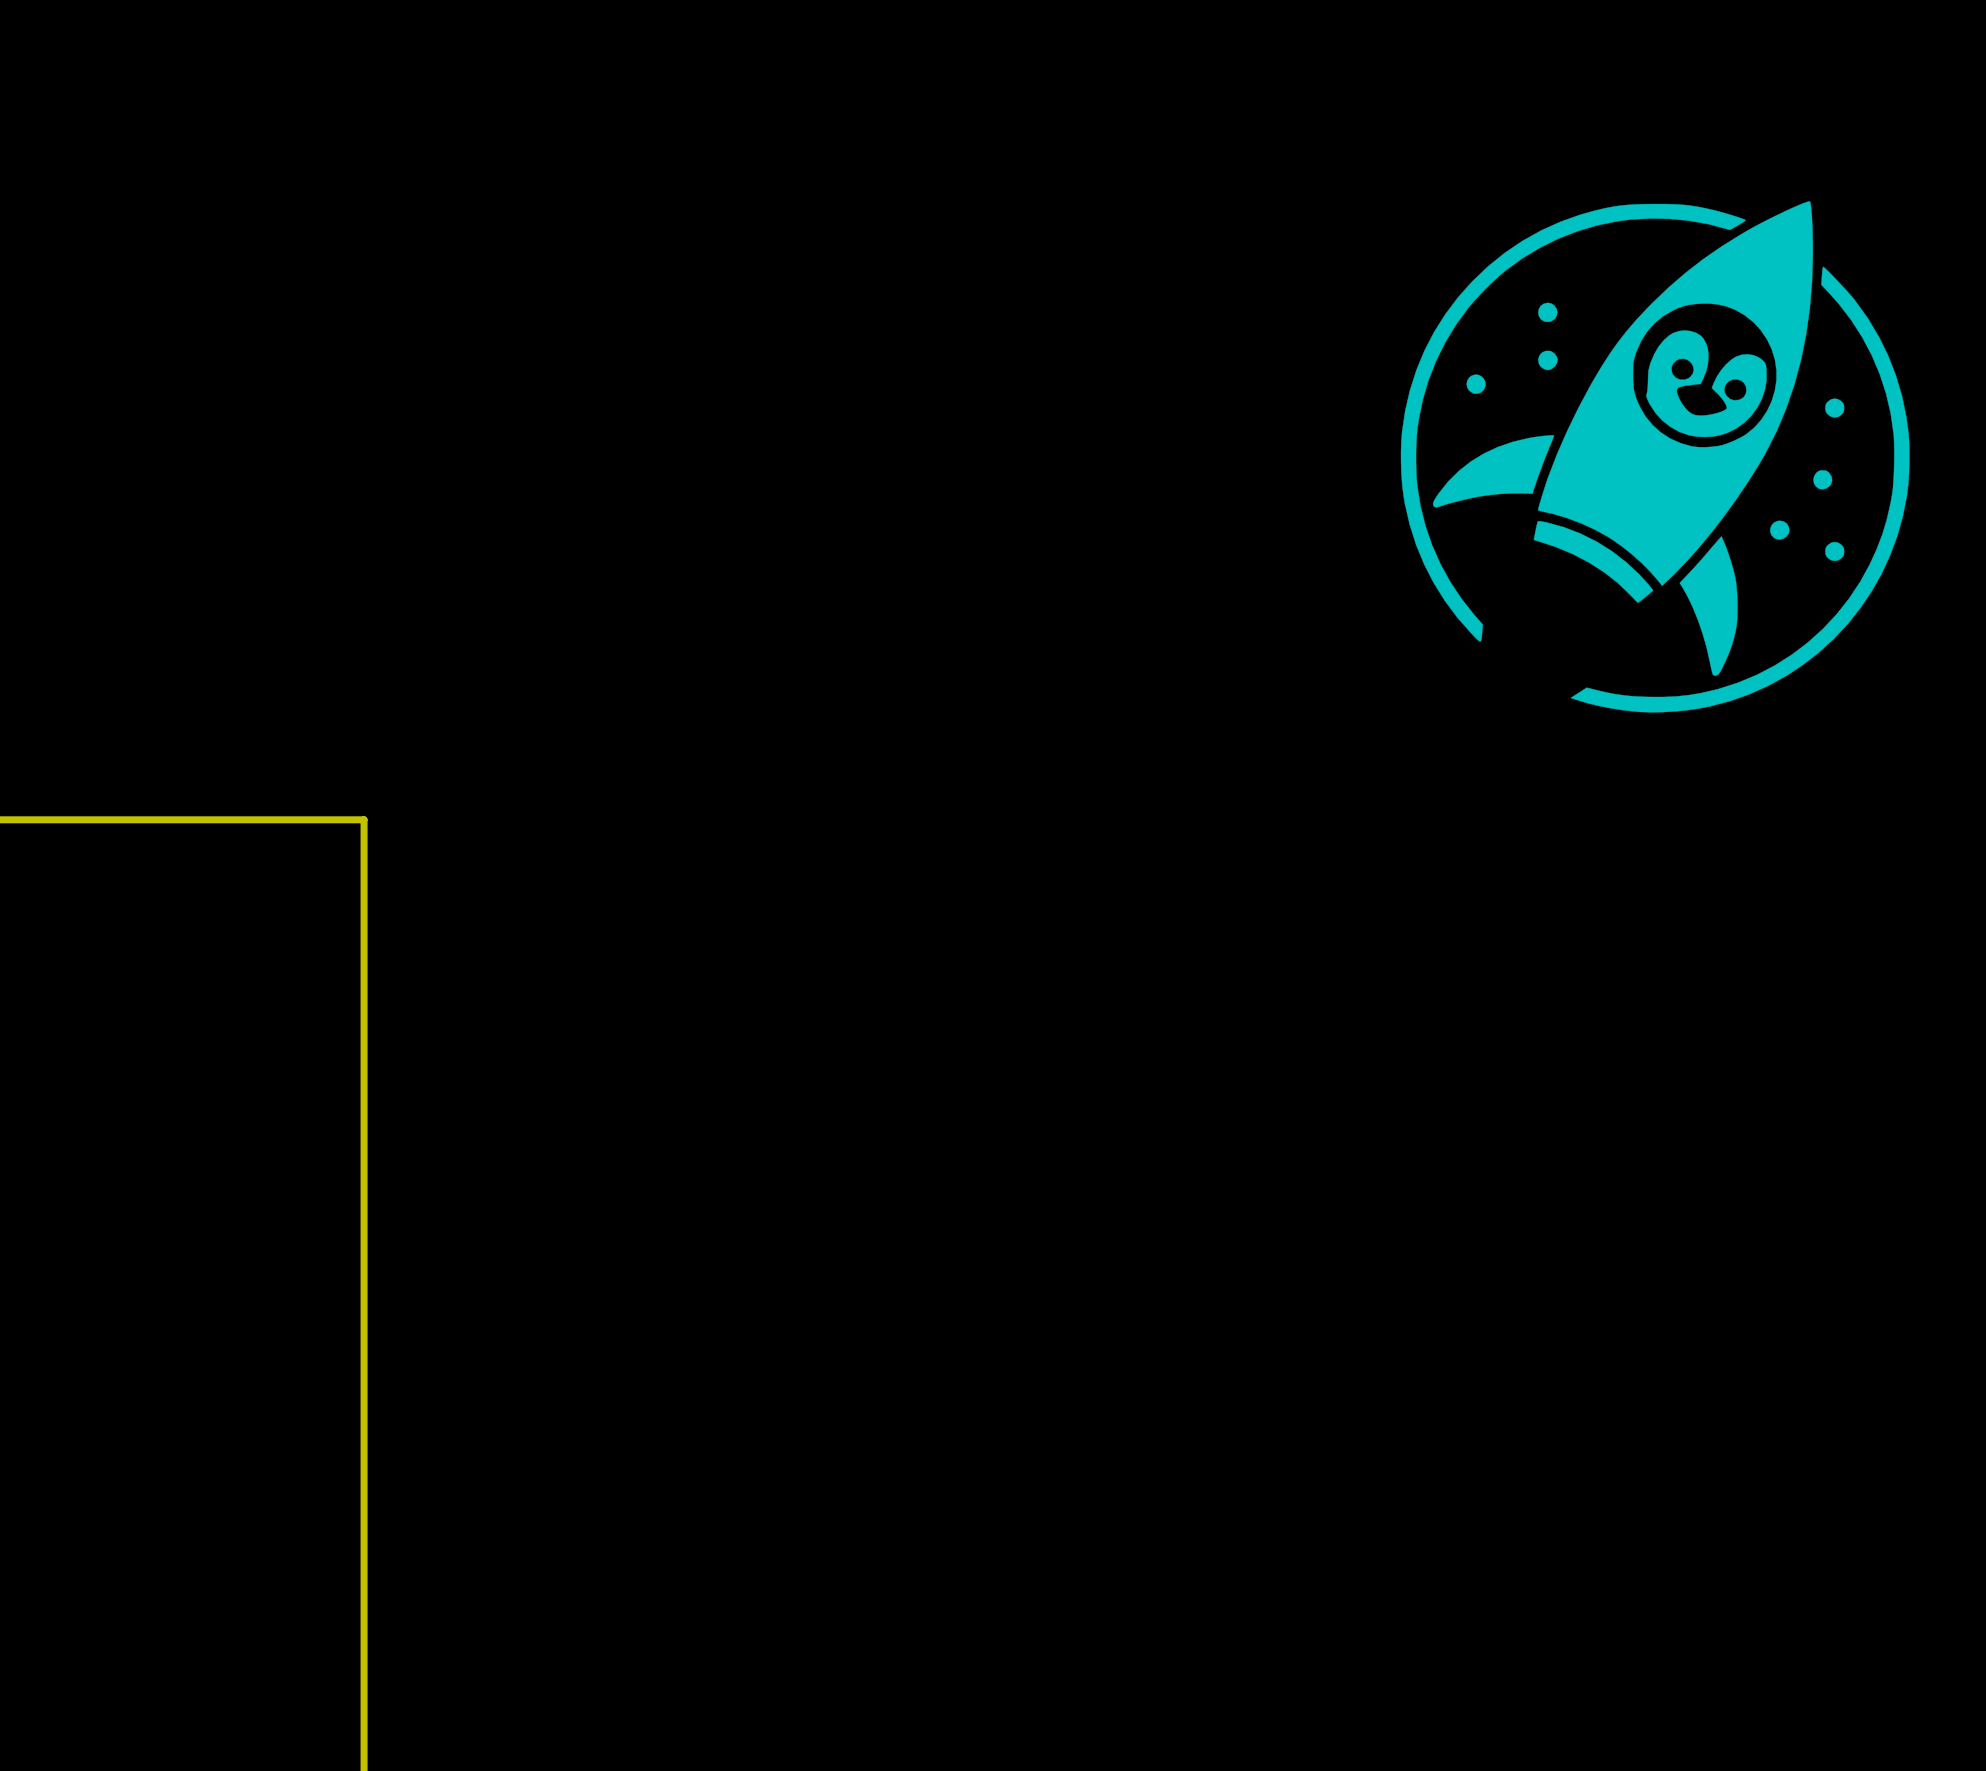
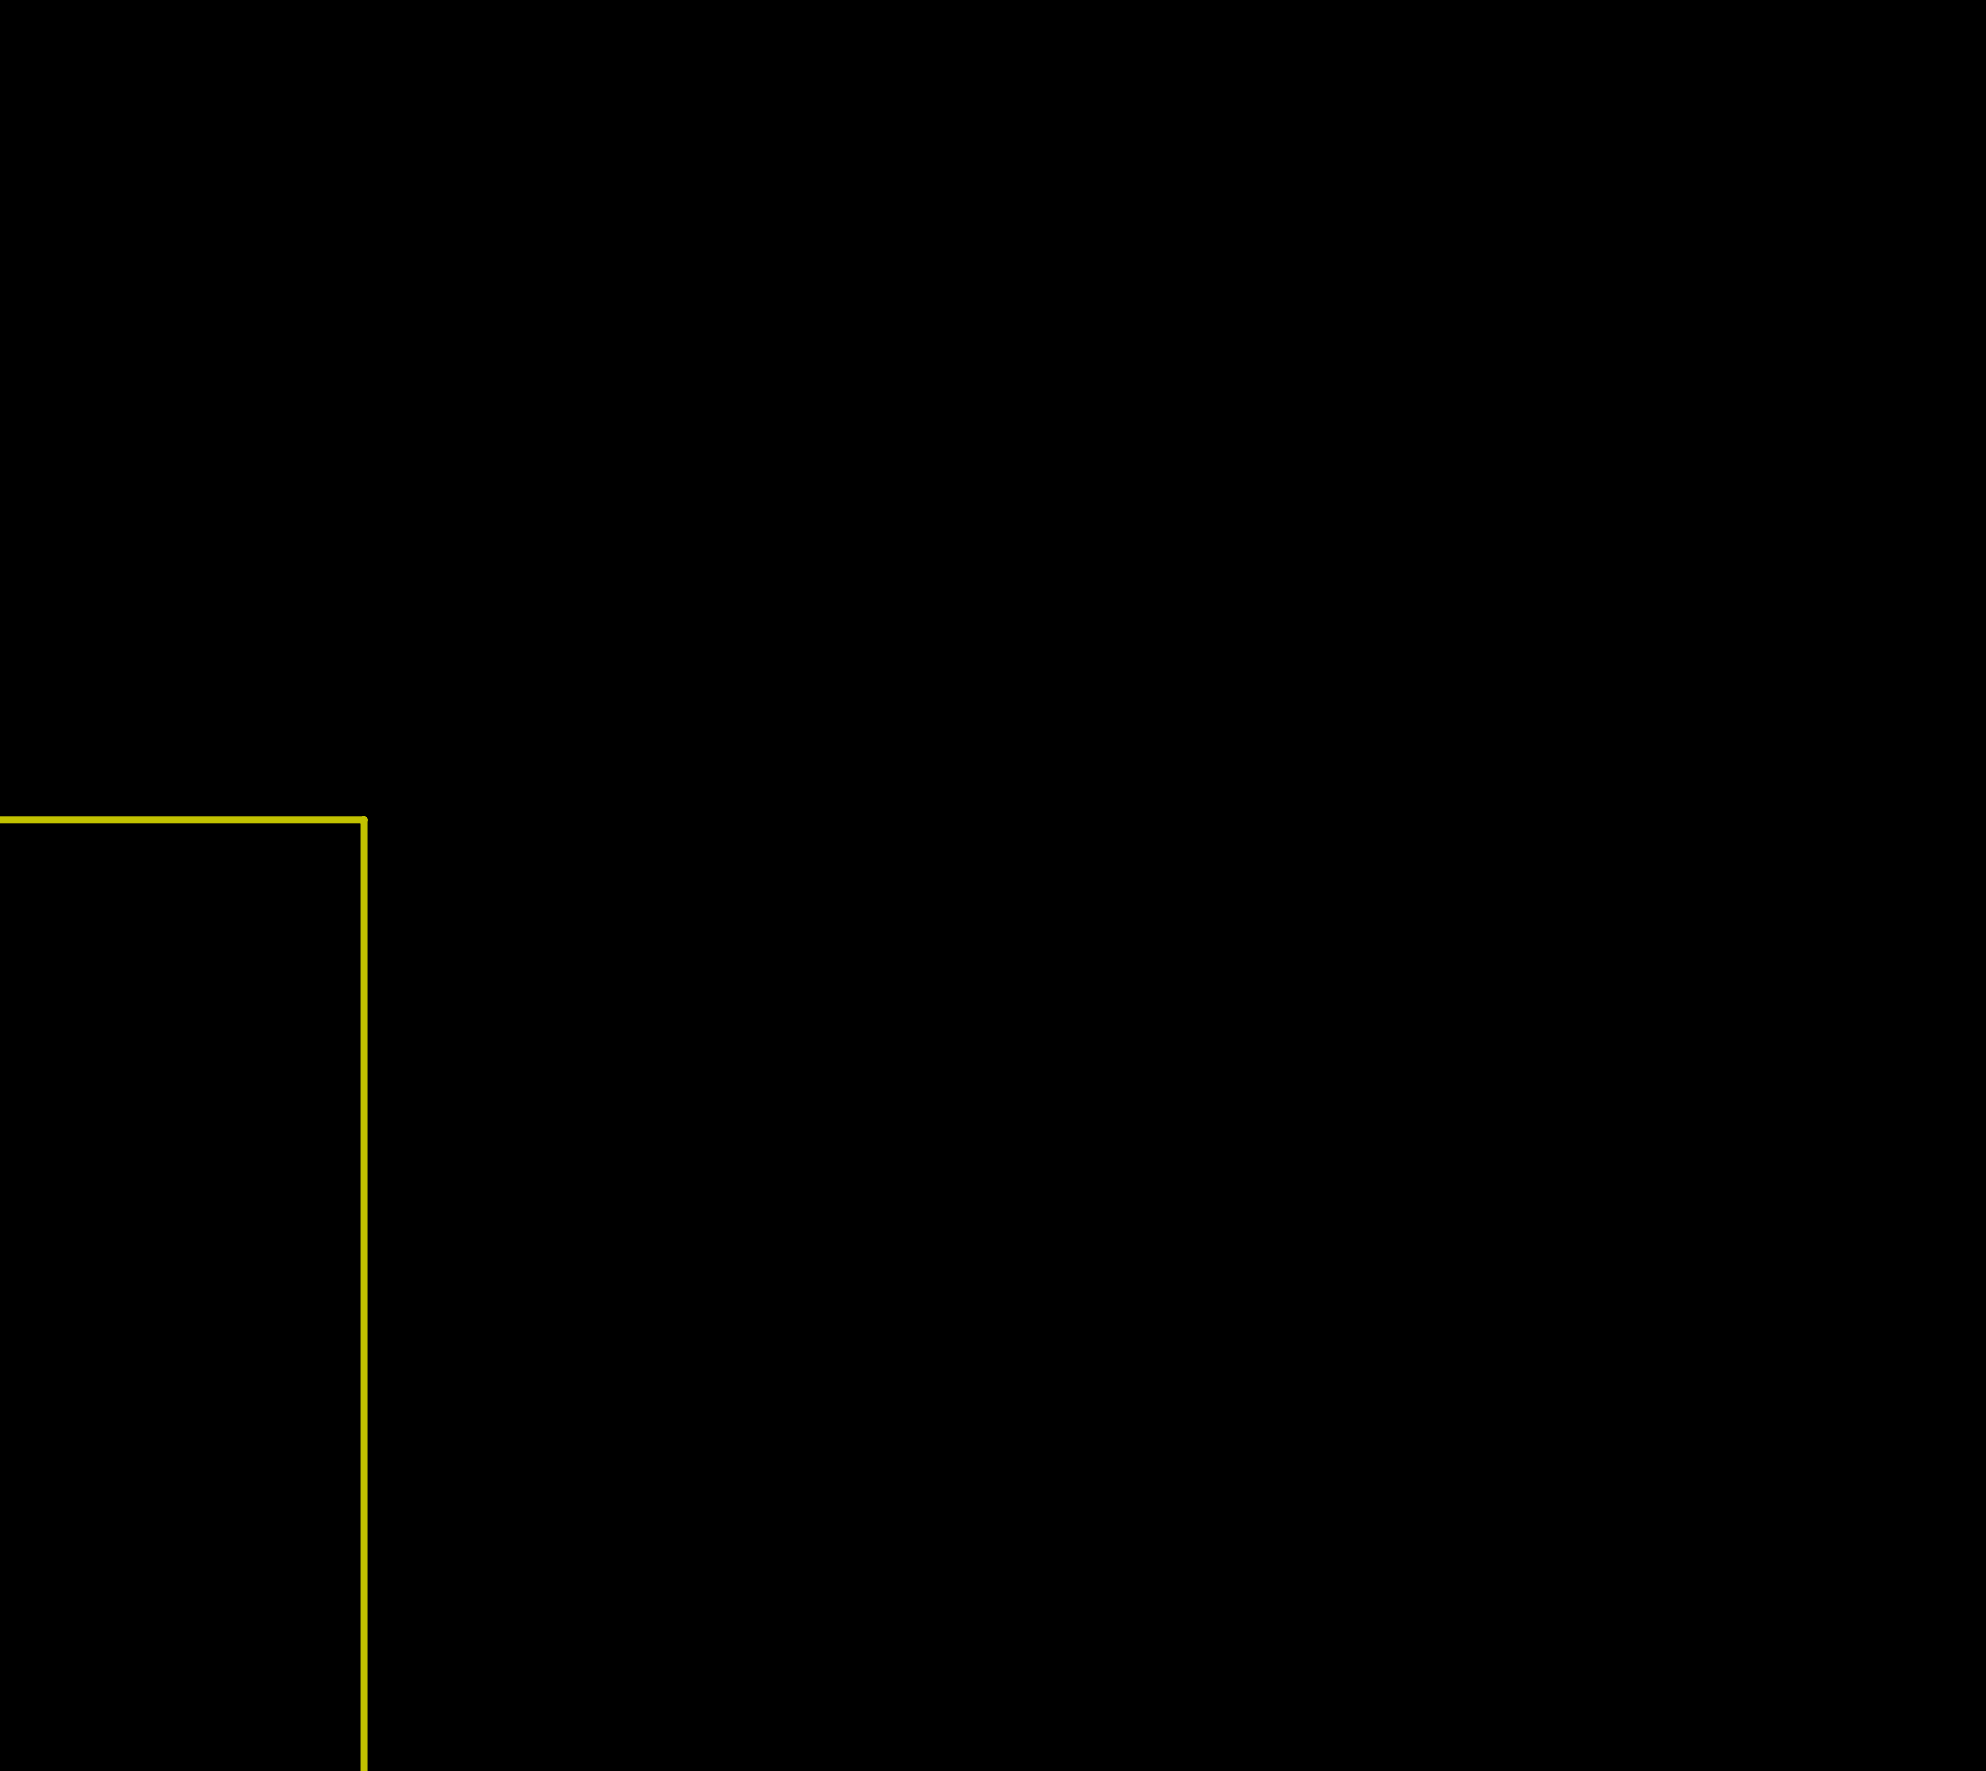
drawing: [1400, 201, 1910, 713] -> none

